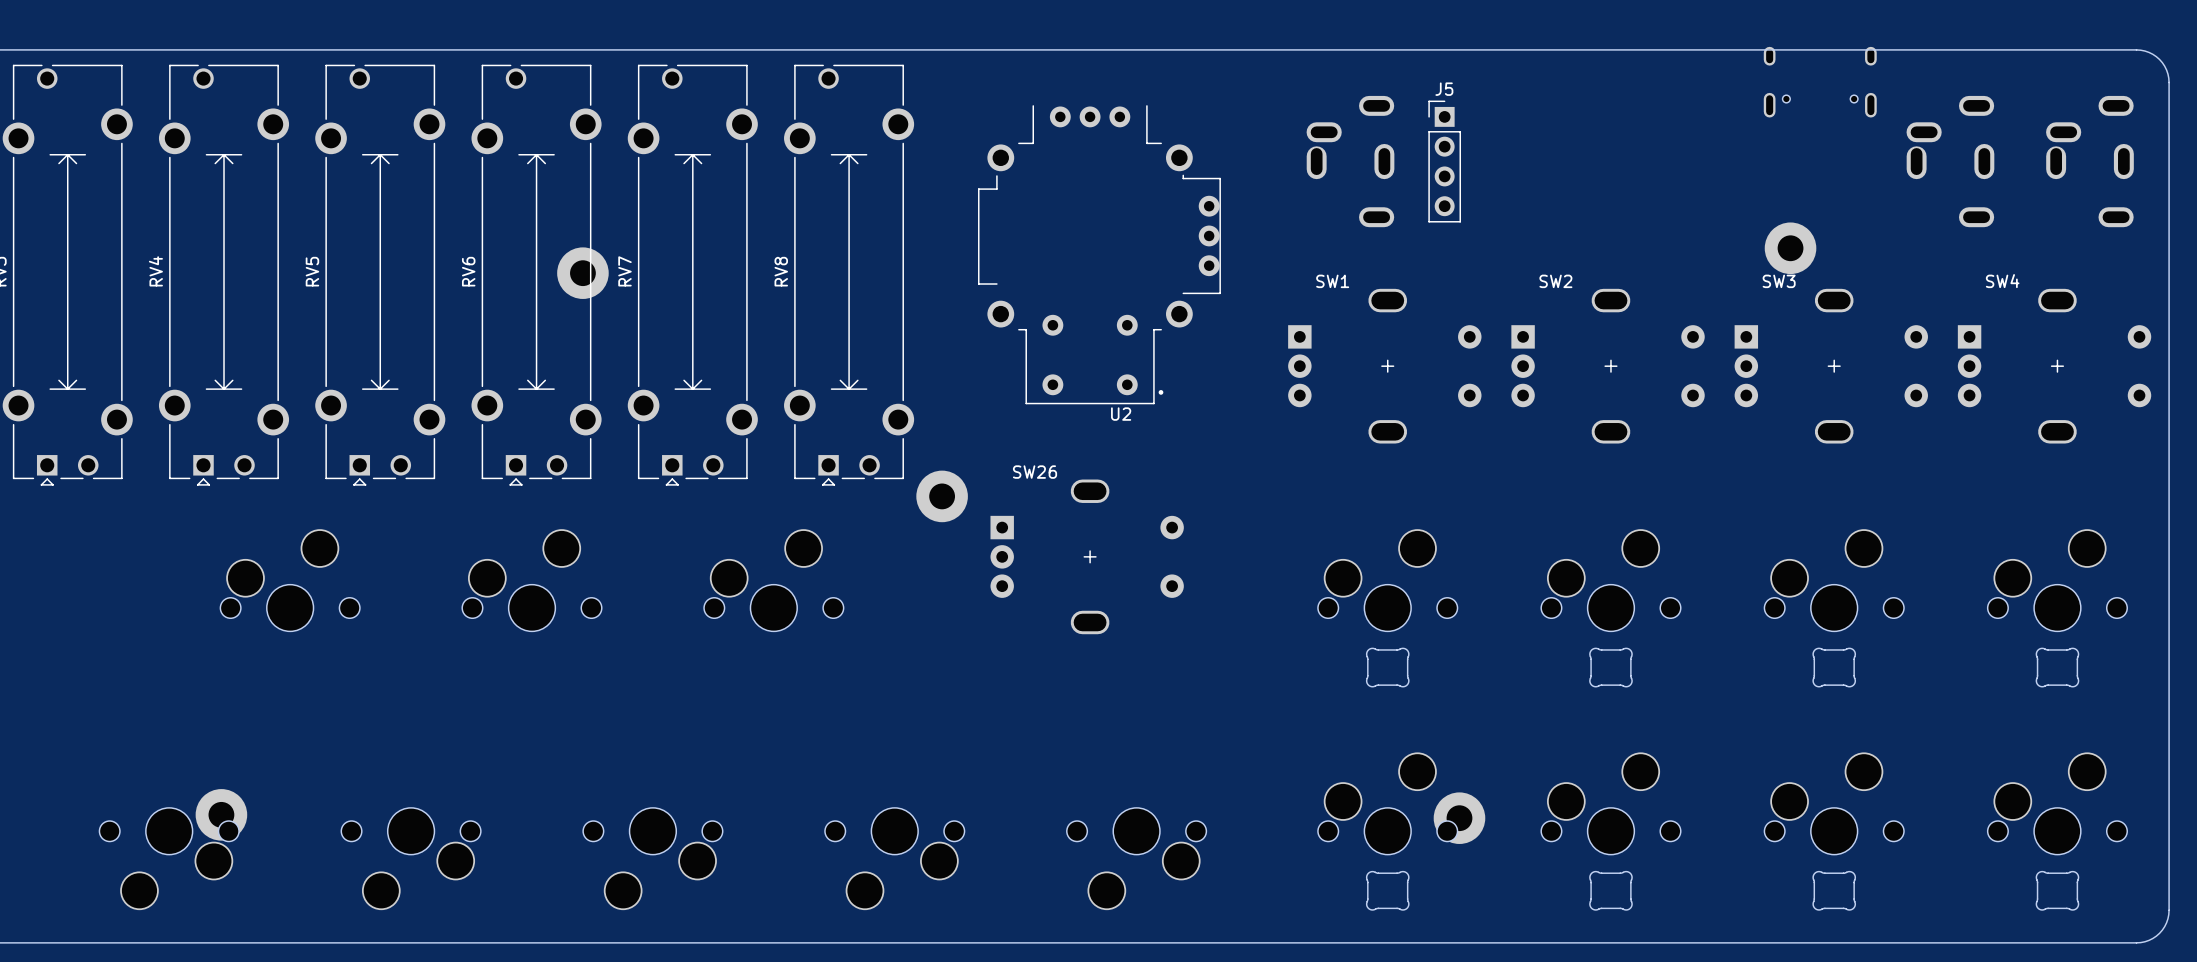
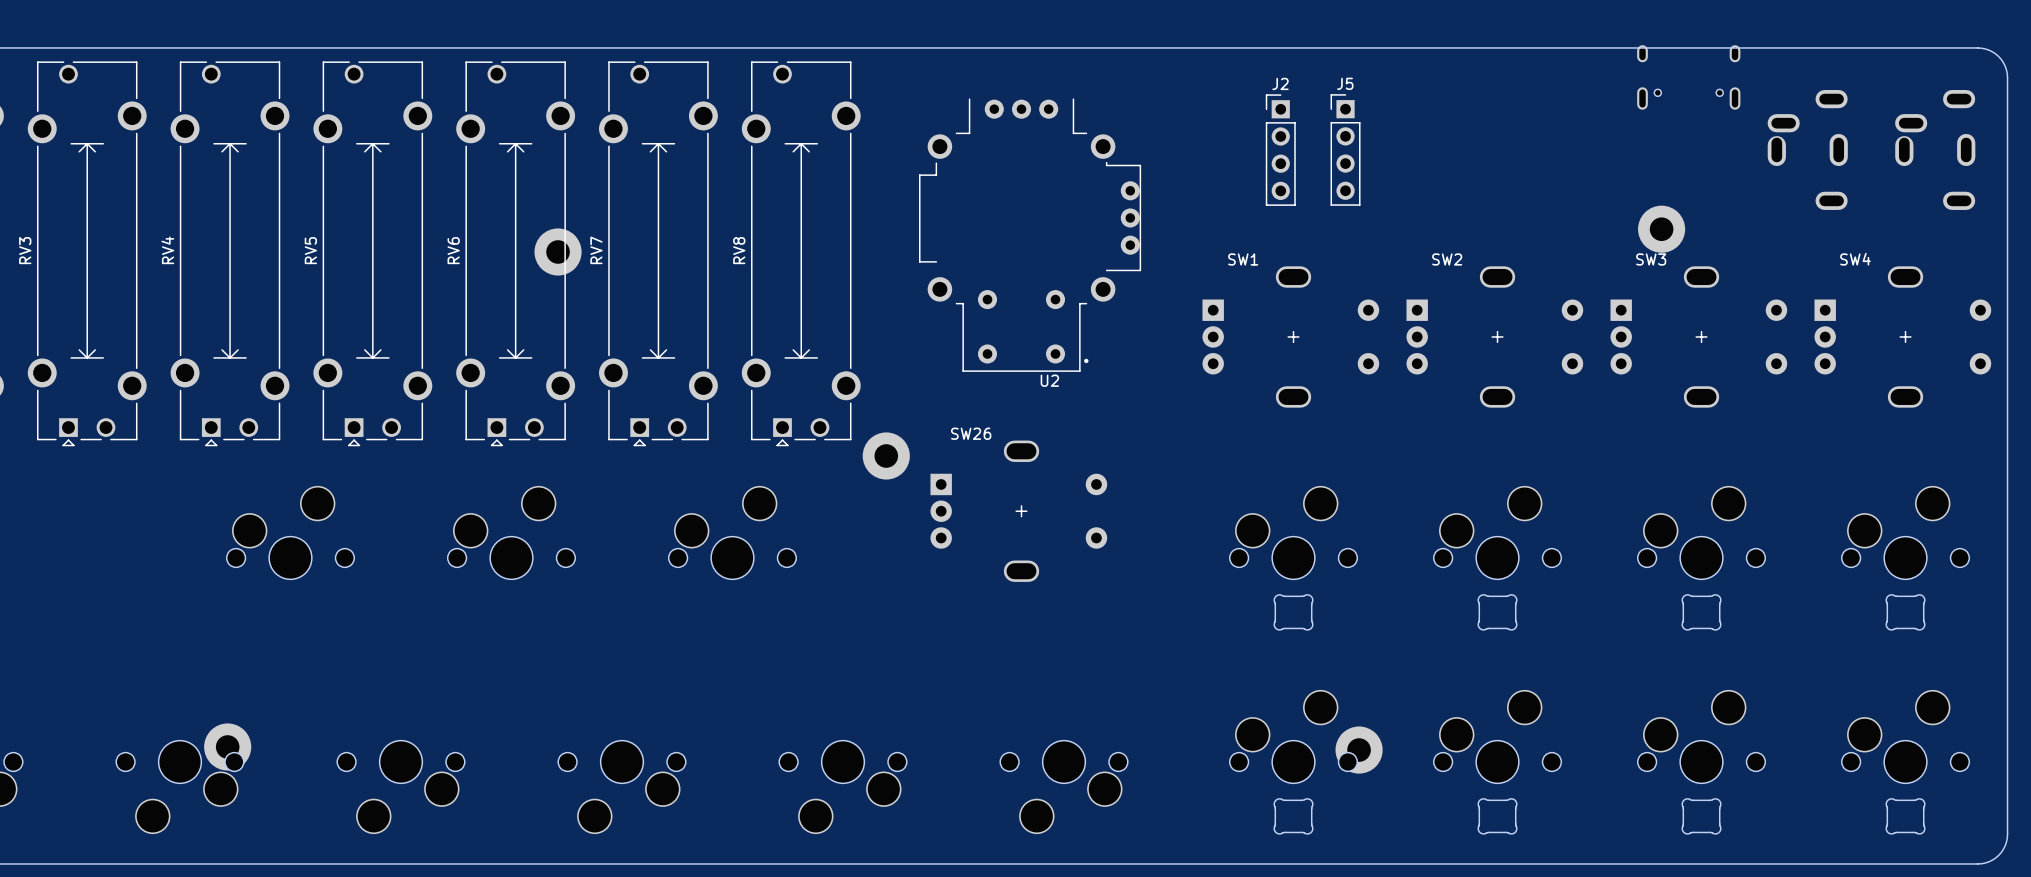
part: (1350, 161) -> none
J2: none -> (1280, 150)

